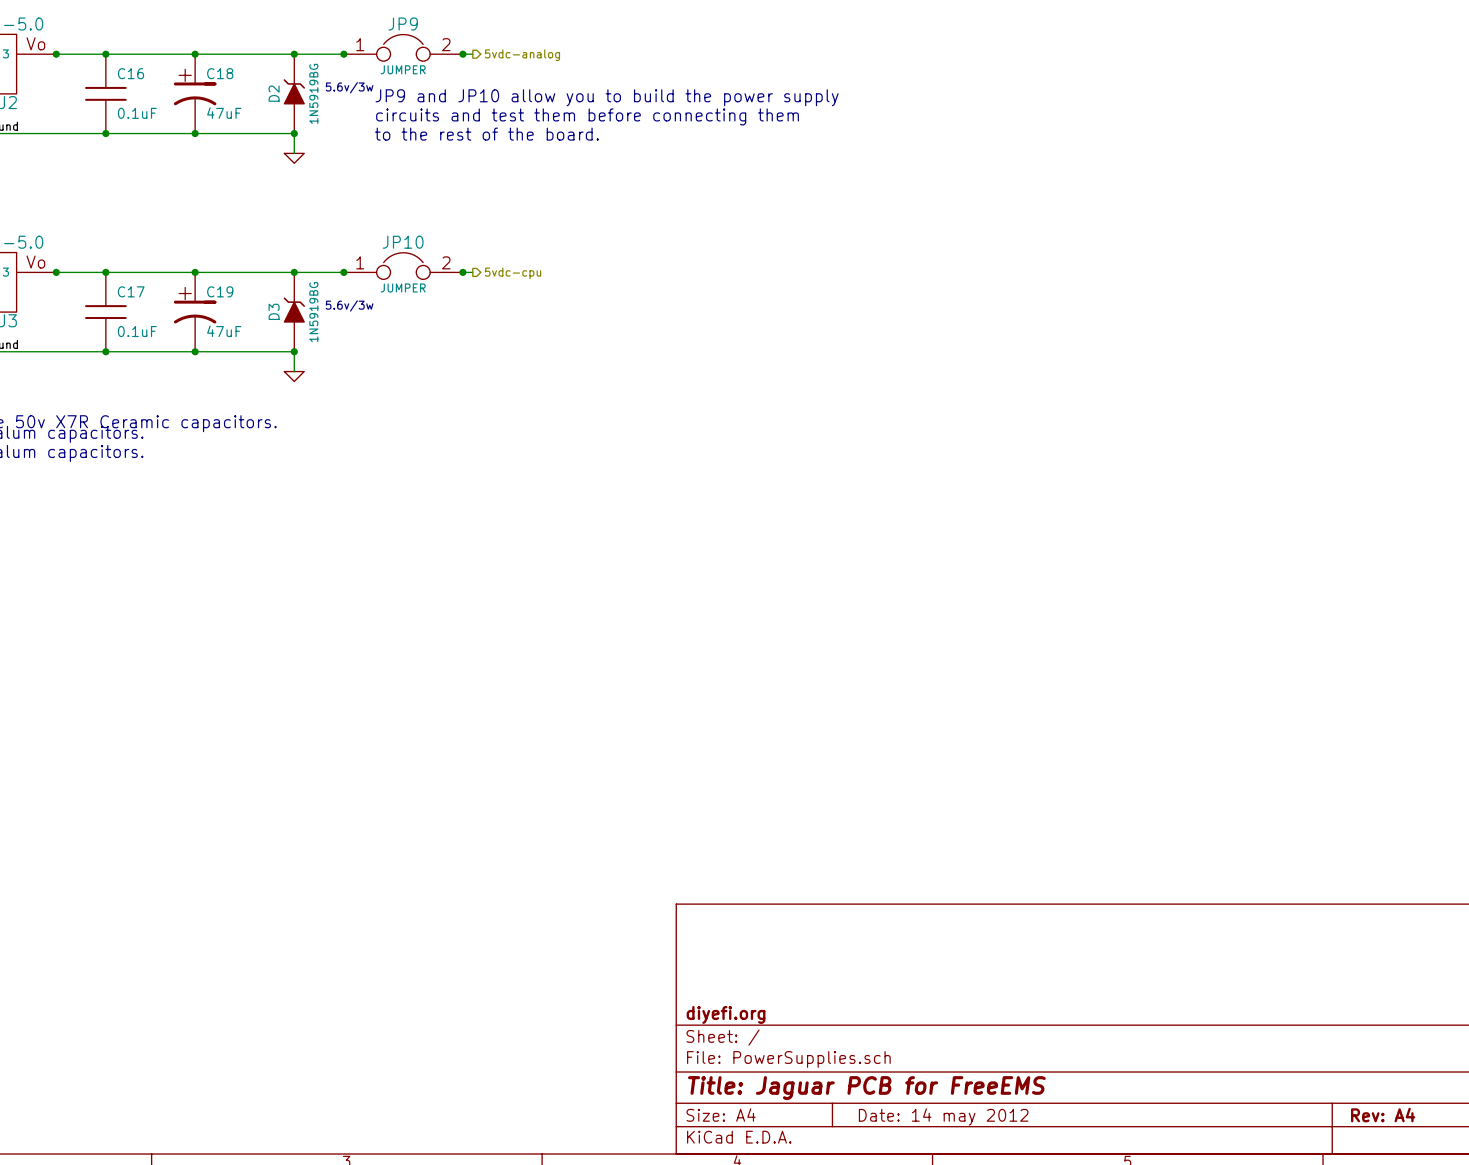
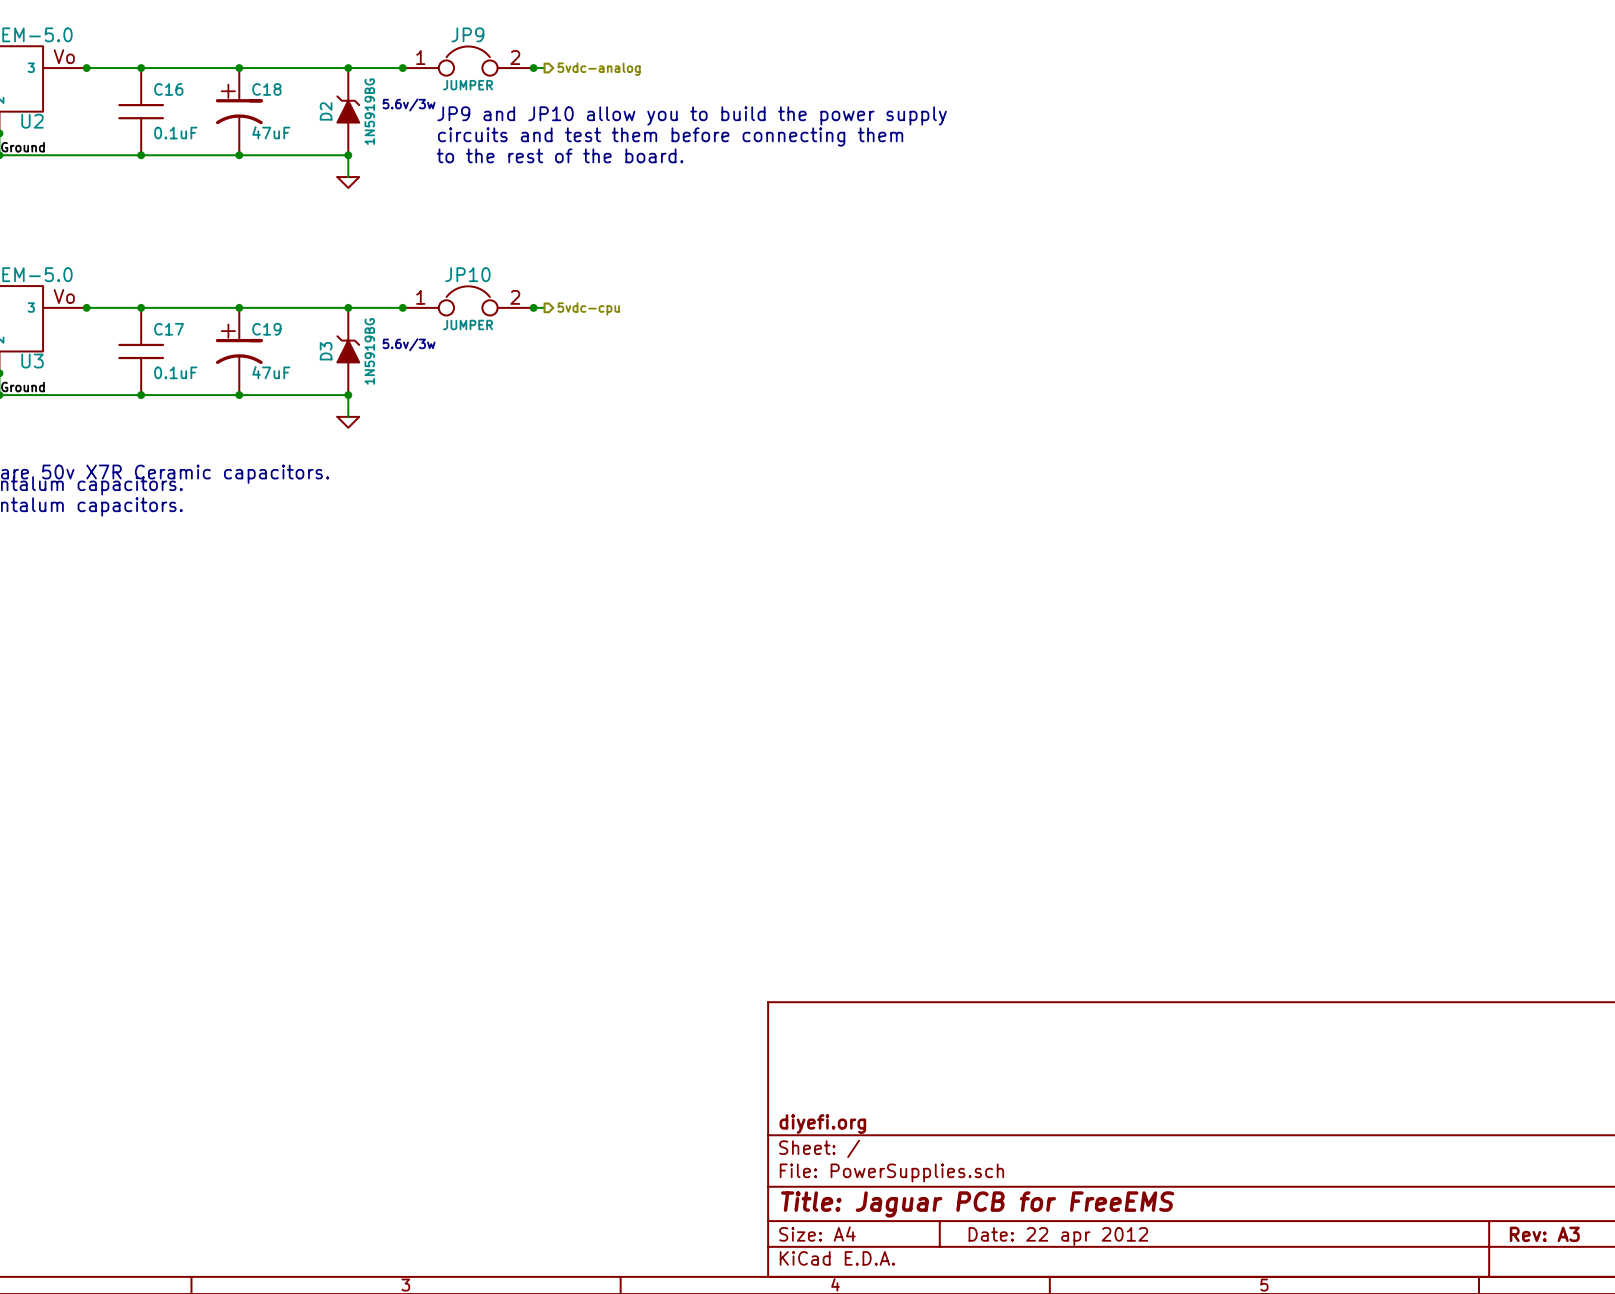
title block: Rev: A4 (1383, 1115) -> Rev: A3 (1544, 1234)
title block: Date: 14 may 2012 (943, 1116) -> Date: 22 apr 2012 (1058, 1236)

